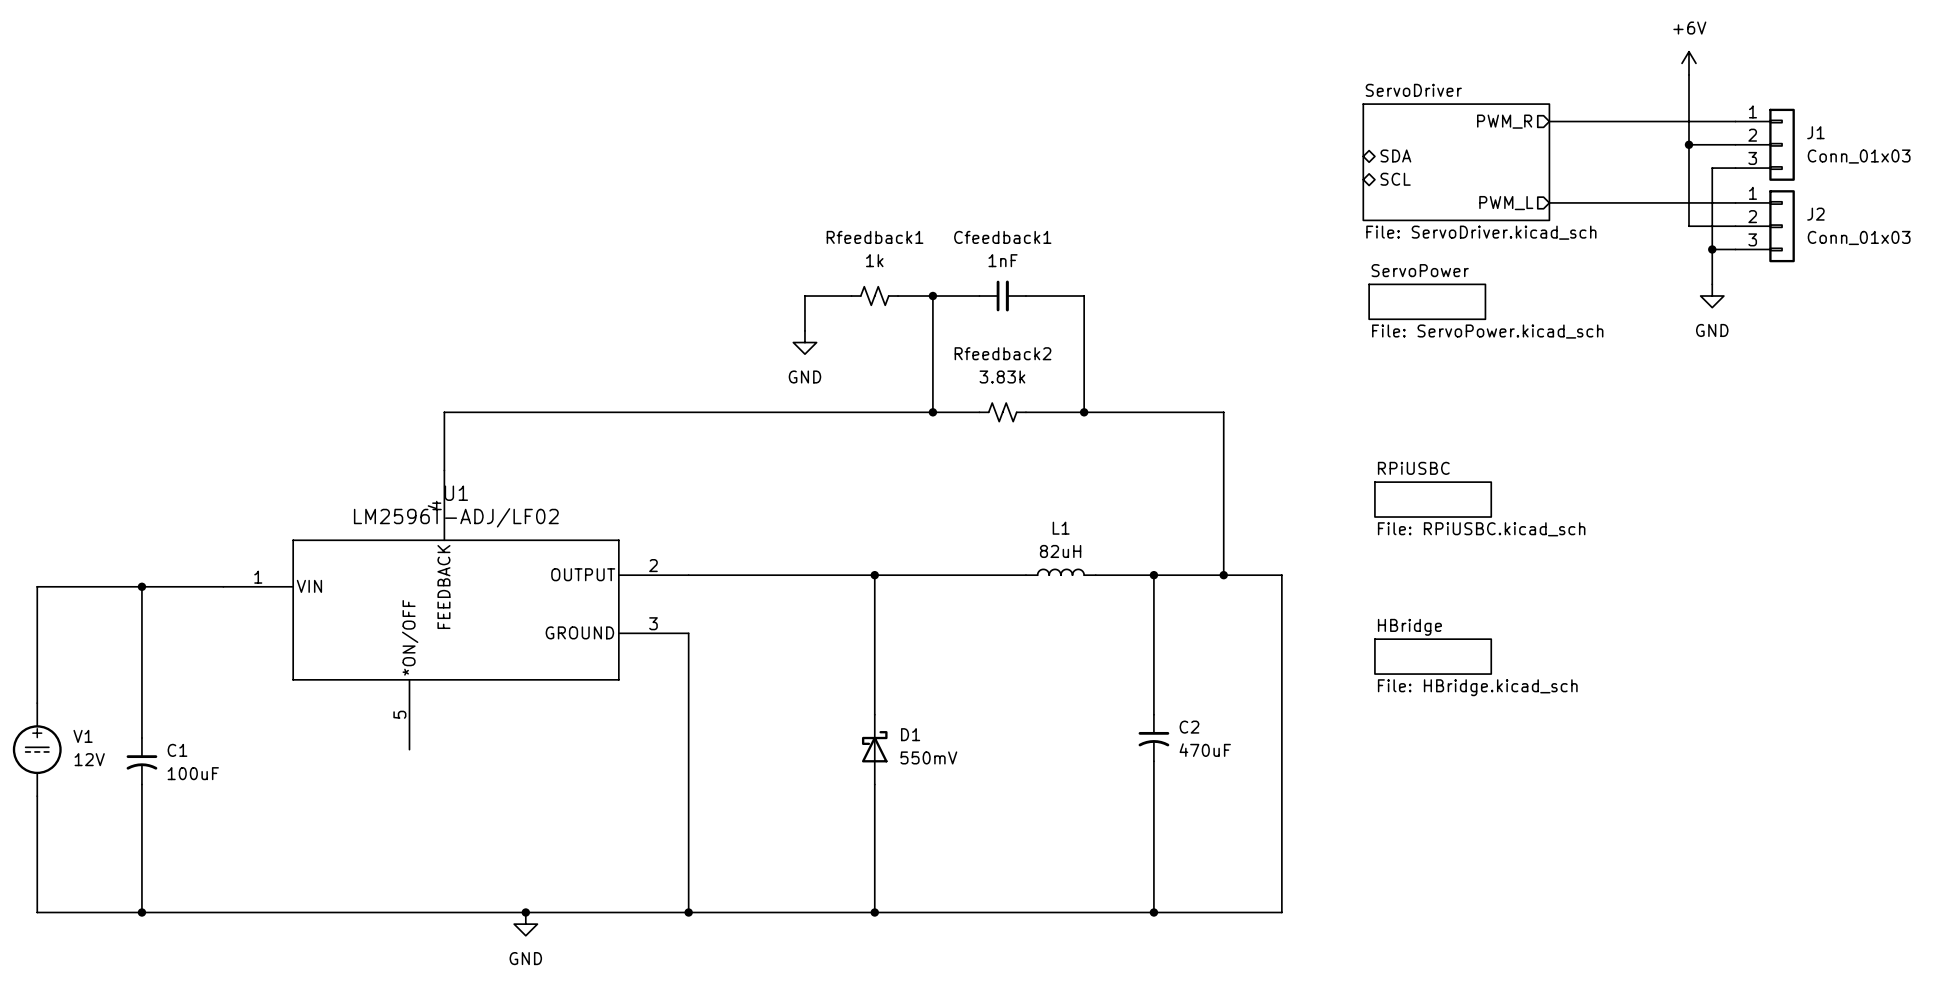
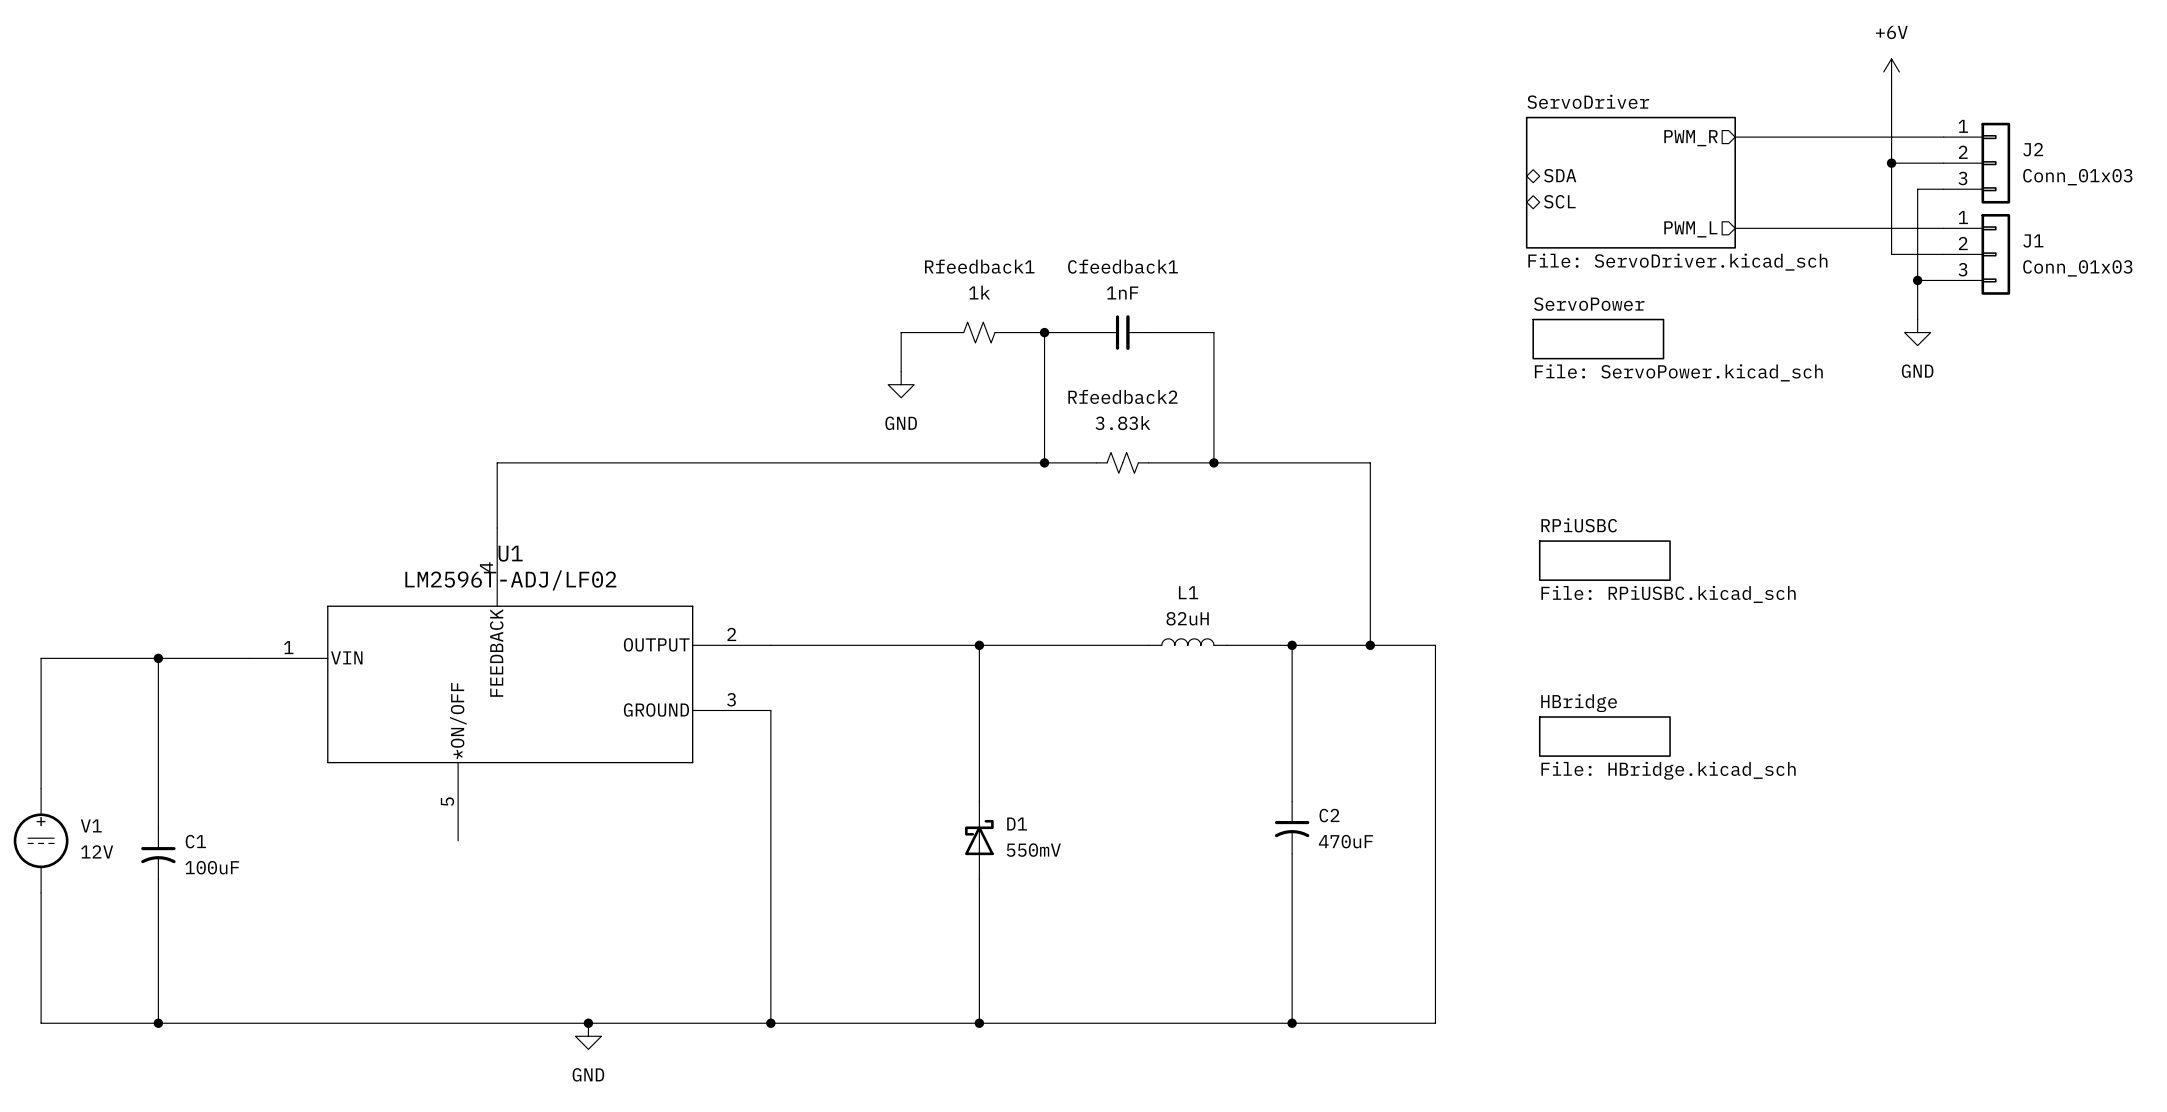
J1 name: J1 (1815, 132) -> J2 (2033, 149)
J2 name: J2 (1815, 214) -> J1 (2033, 240)

